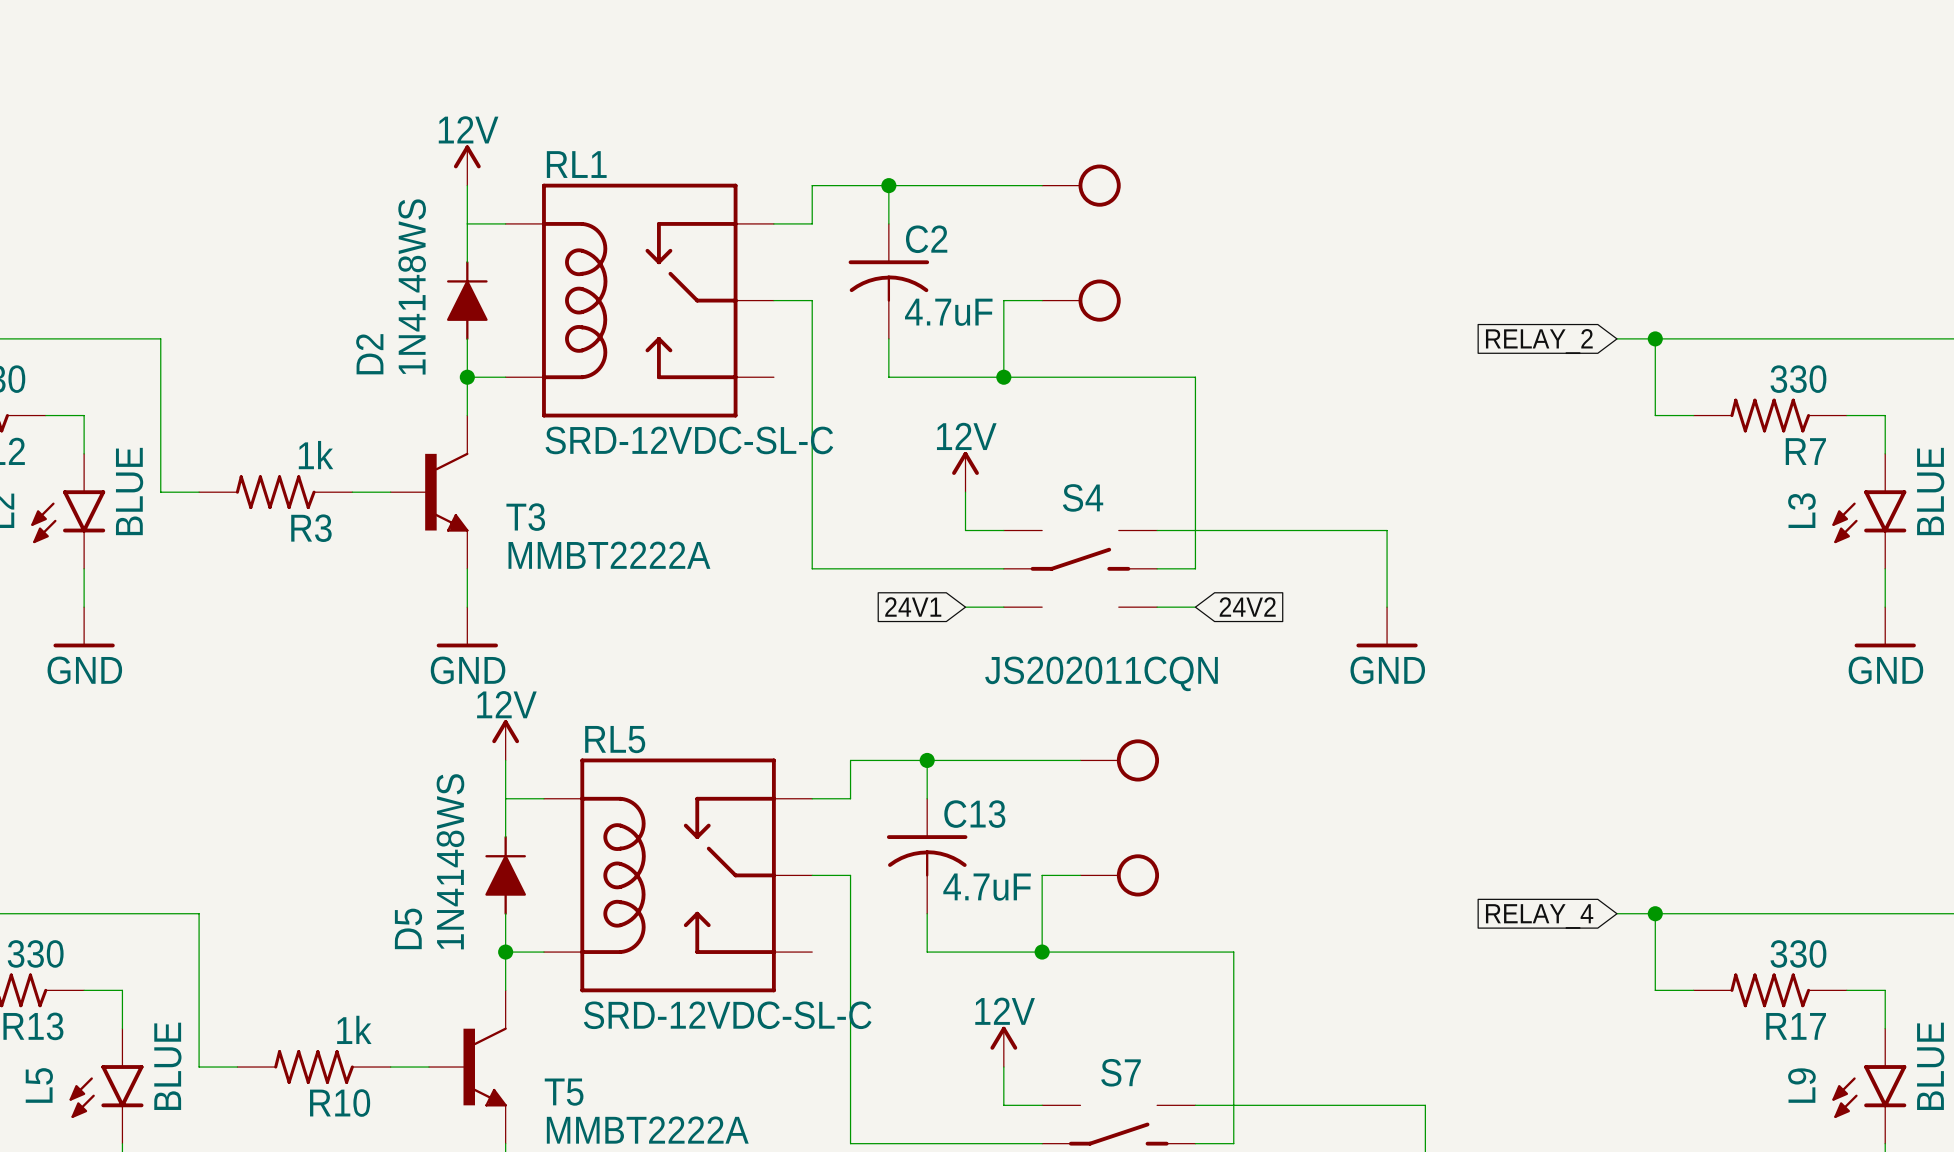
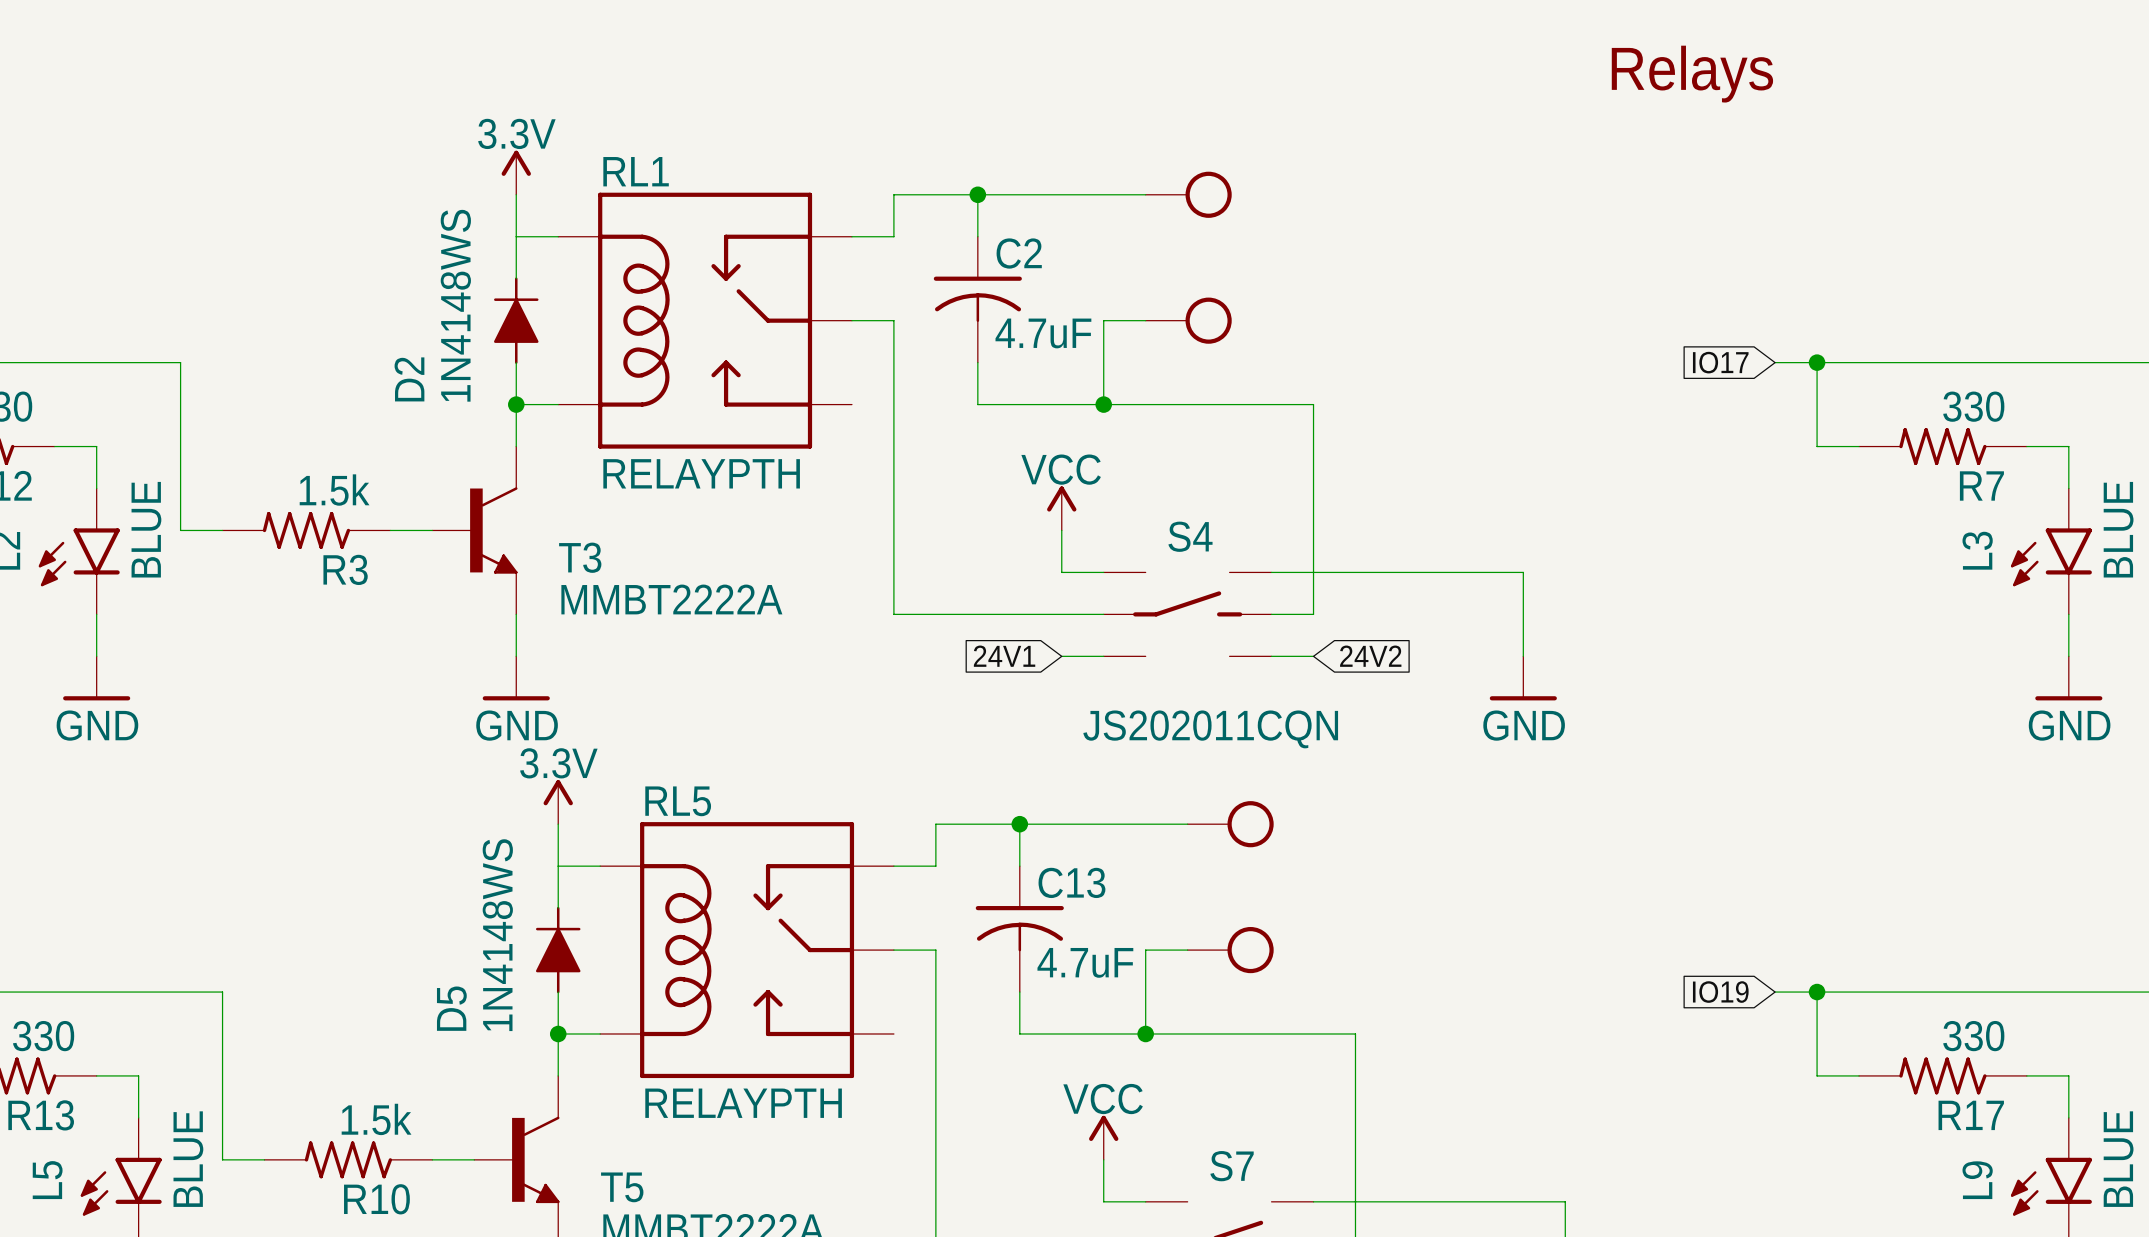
text: none -> Relays (1692, 74)
power symbol: 12V (467, 165) -> 3.3V (516, 172)
global label: RELAY_2 (1539, 341) -> IO17 (1720, 362)
RL1 value: SRD-12VDC-SL-C (689, 440) -> RELAYPTH (701, 473)
R3 value: 1k (316, 455) -> 1.5k (334, 490)
power symbol: 12V (965, 472) -> VCC (1061, 508)
power symbol: 12V (505, 740) -> 3.3V (558, 802)
global label: RELAY_4 (1539, 916) -> IO19 (1720, 992)
RL5 value: SRD-12VDC-SL-C (727, 1015) -> RELAYPTH (743, 1103)
R10 value: 1k (354, 1029) -> 1.5k (376, 1119)
power symbol: 12V (1003, 1046) -> VCC (1103, 1137)

